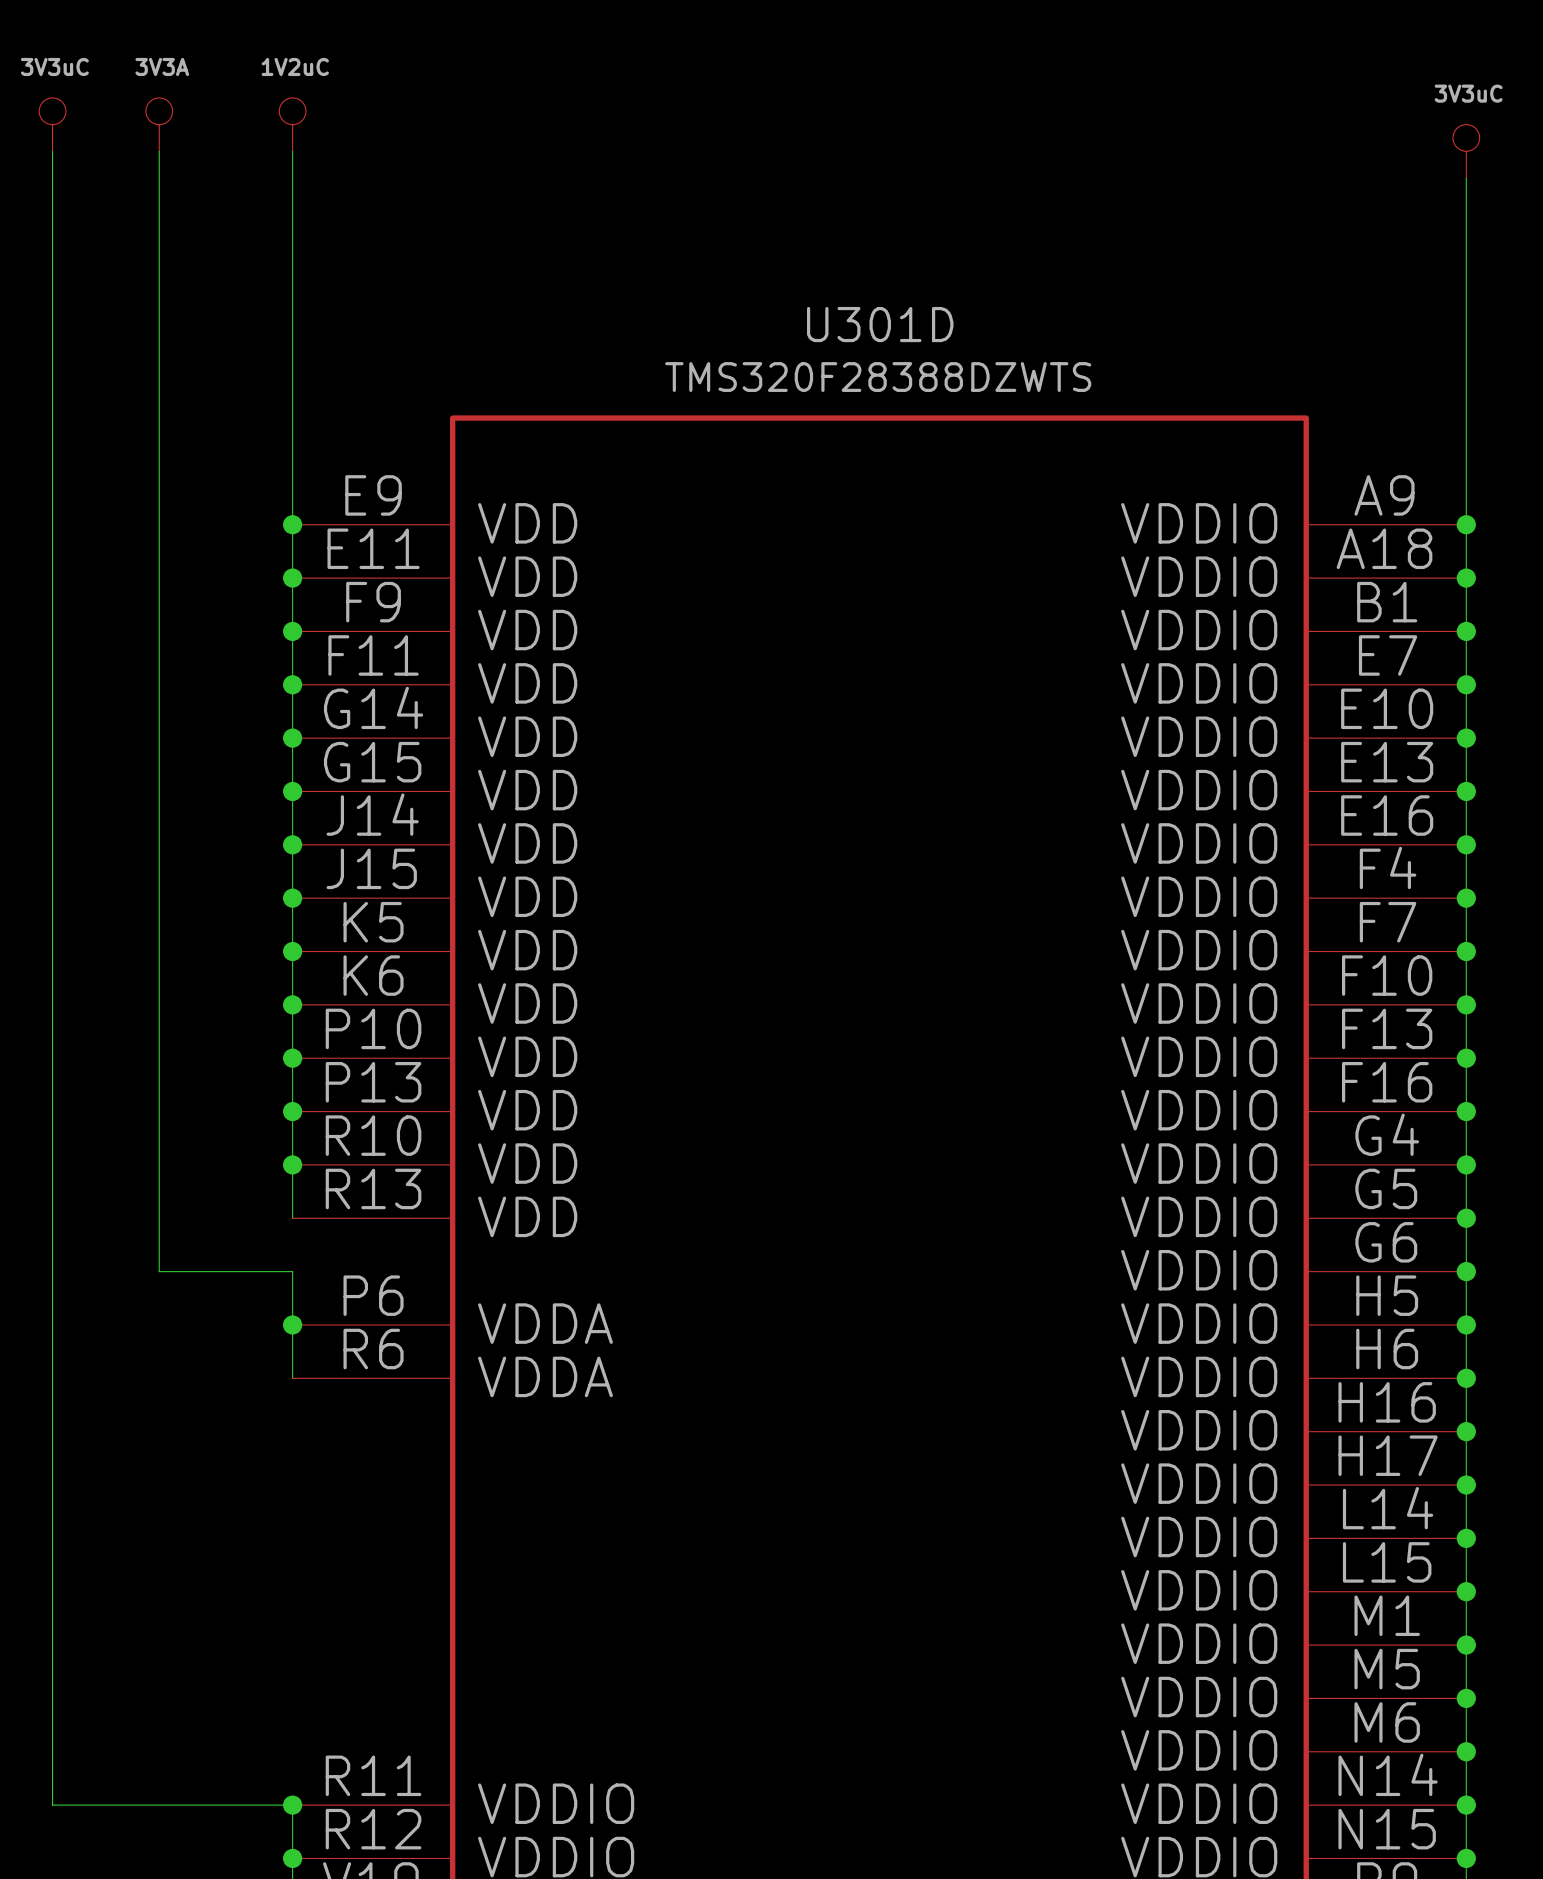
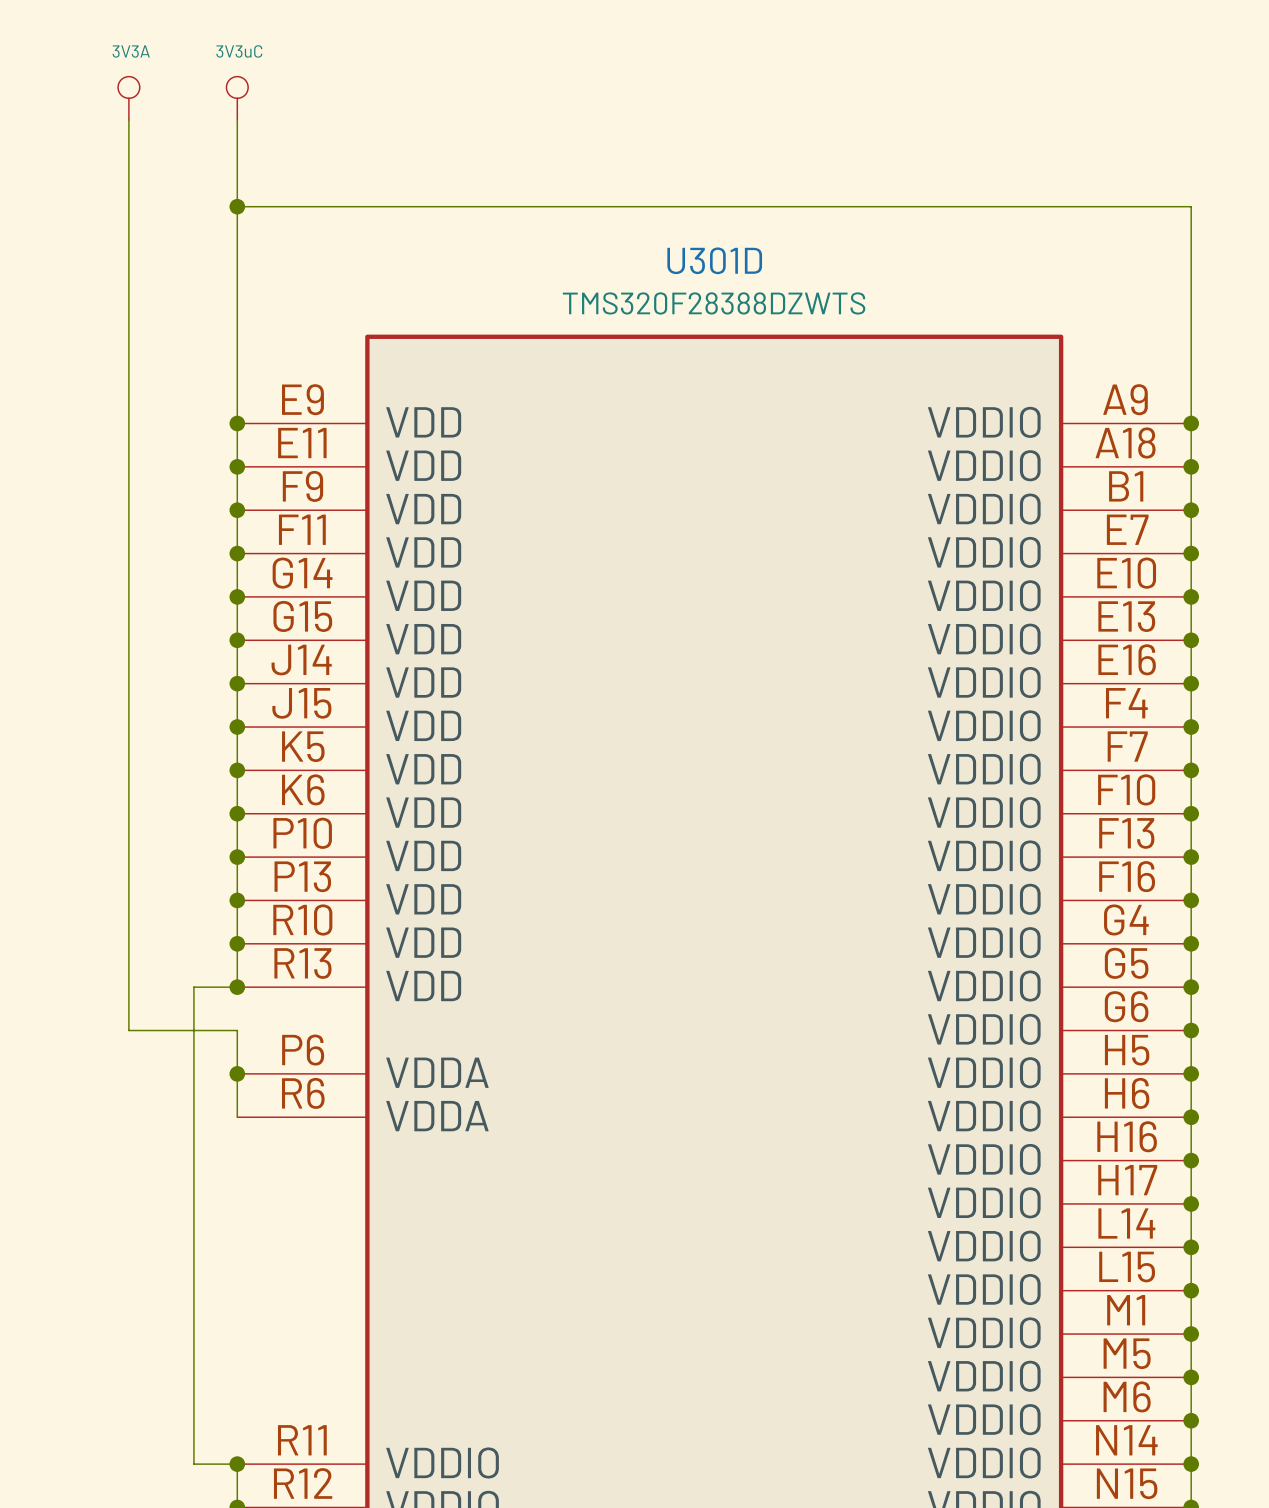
power symbol: 3V3uC (52, 124) -> none
power symbol: 1V2uC (292, 124) -> 3V3uC (237, 98)
wire: (52, 151) (52, 1805) (239, 1805) -> (237, 987) (193, 987) (193, 1464)
power symbol: 3V3uC (1466, 151) -> none
wire: (1466, 177) (1466, 257) -> (237, 206) (1191, 206)
junction: none -> (237, 206)
junction: none -> (237, 987)

